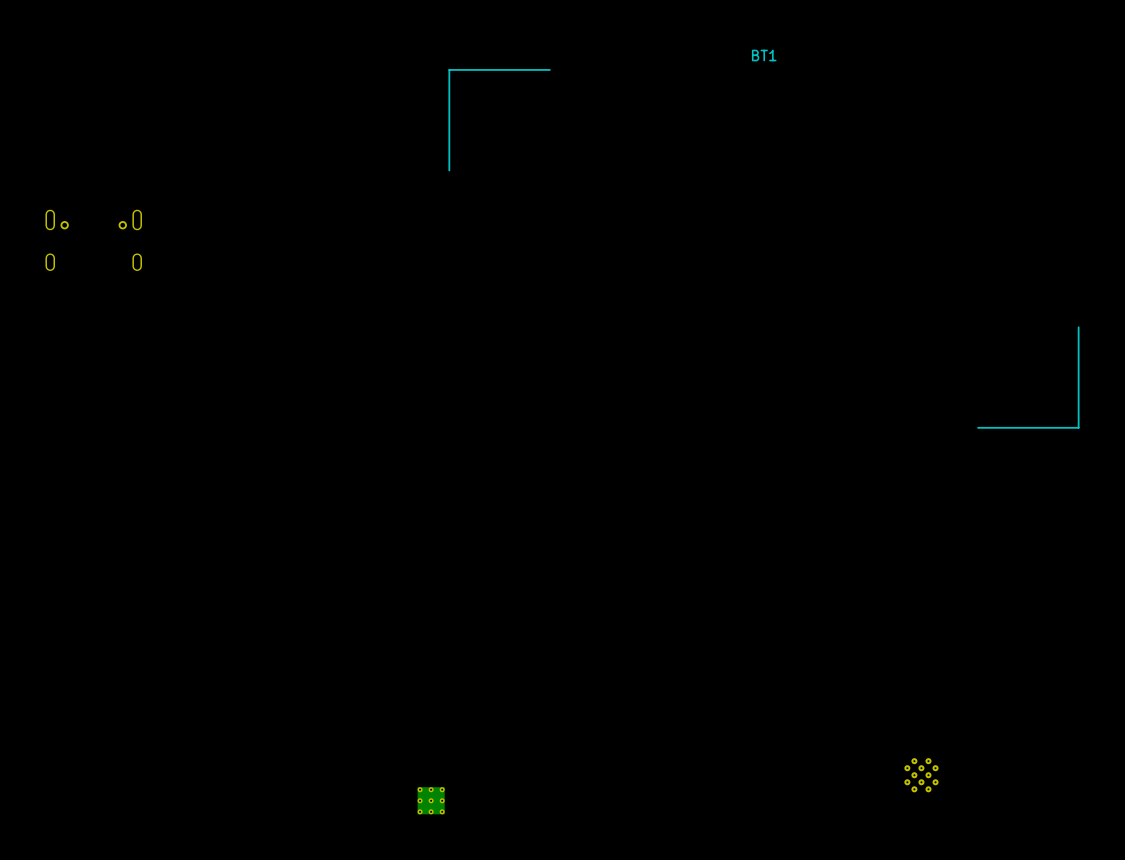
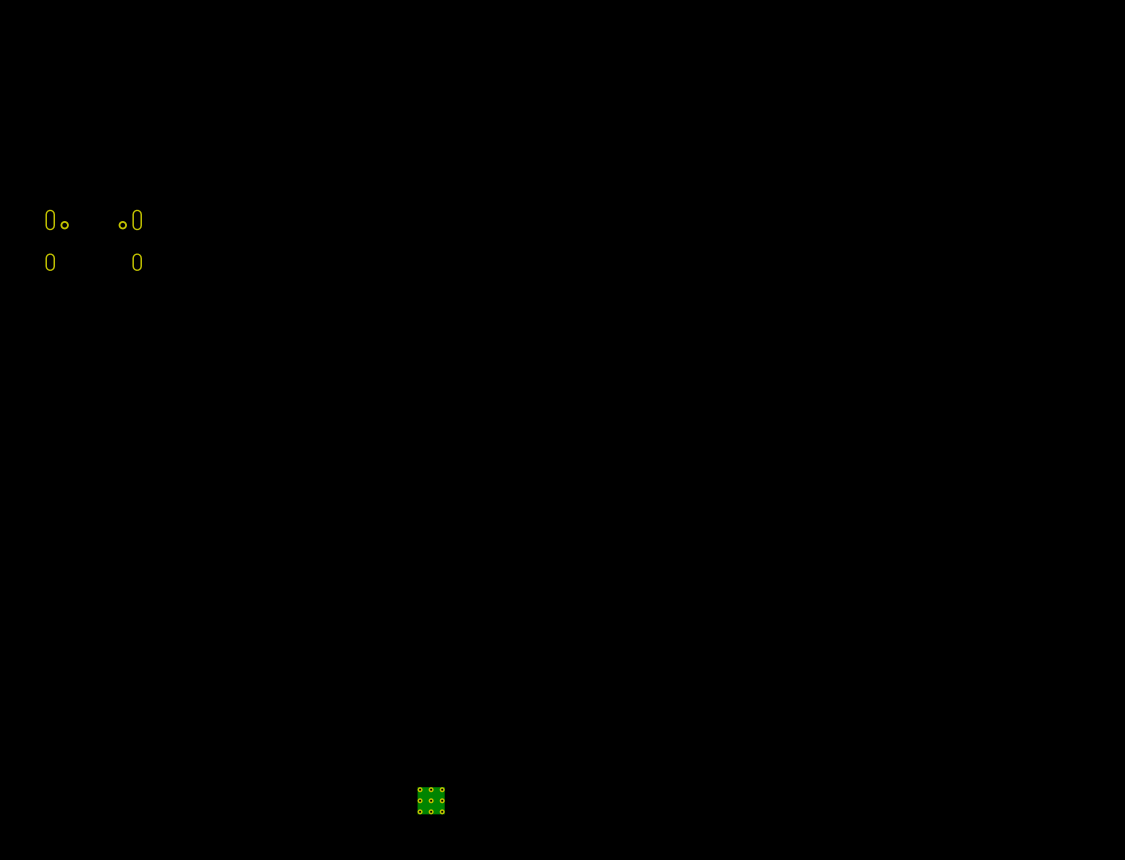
BT1: (763, 248) -> none
part: (921, 775) -> none

